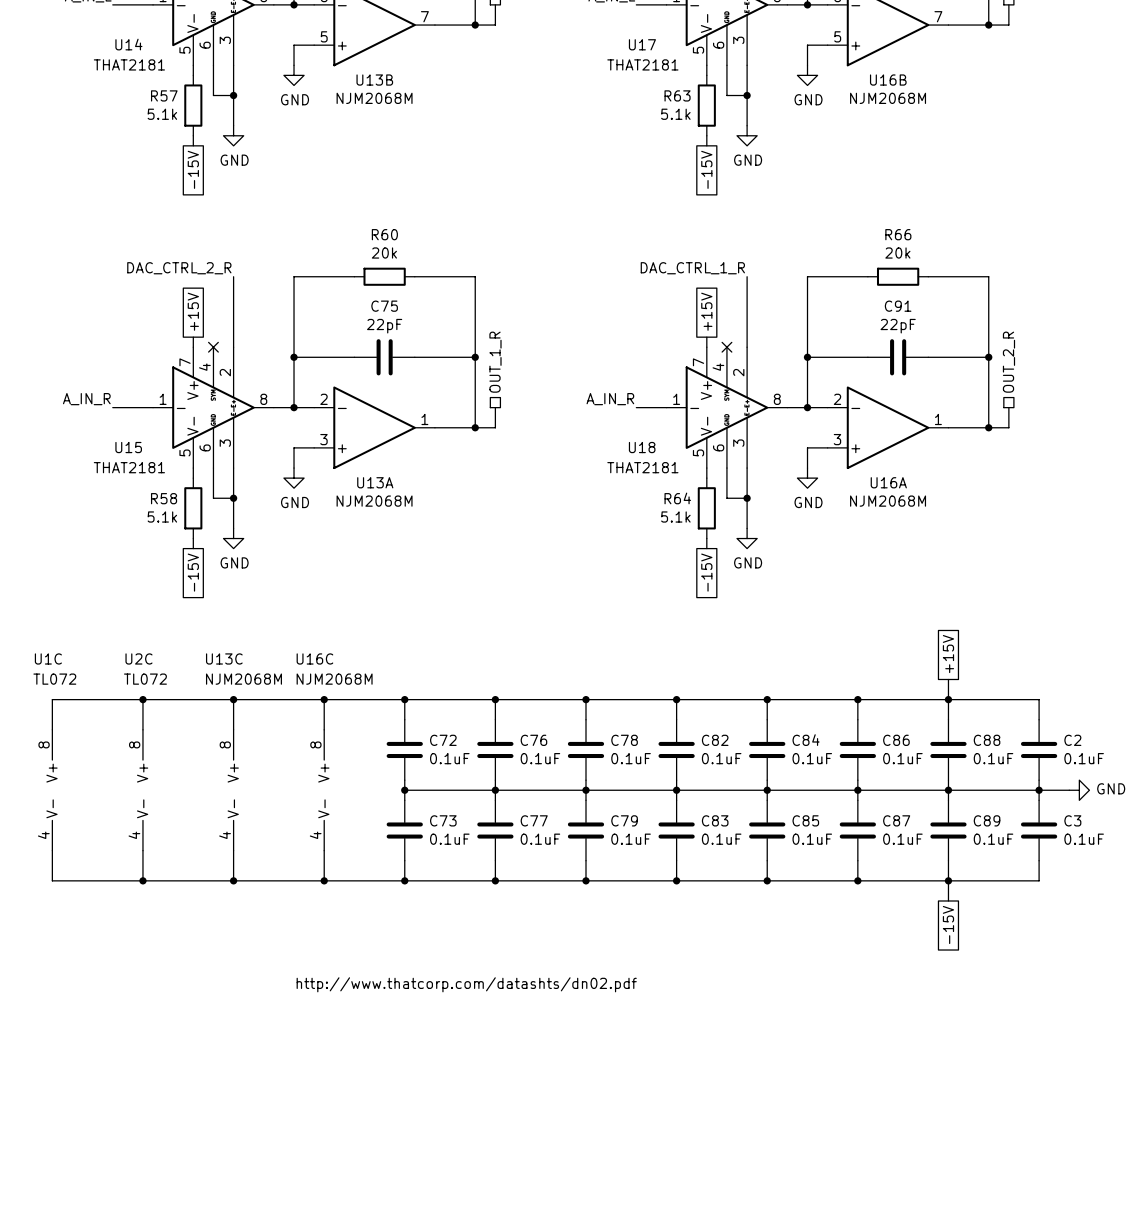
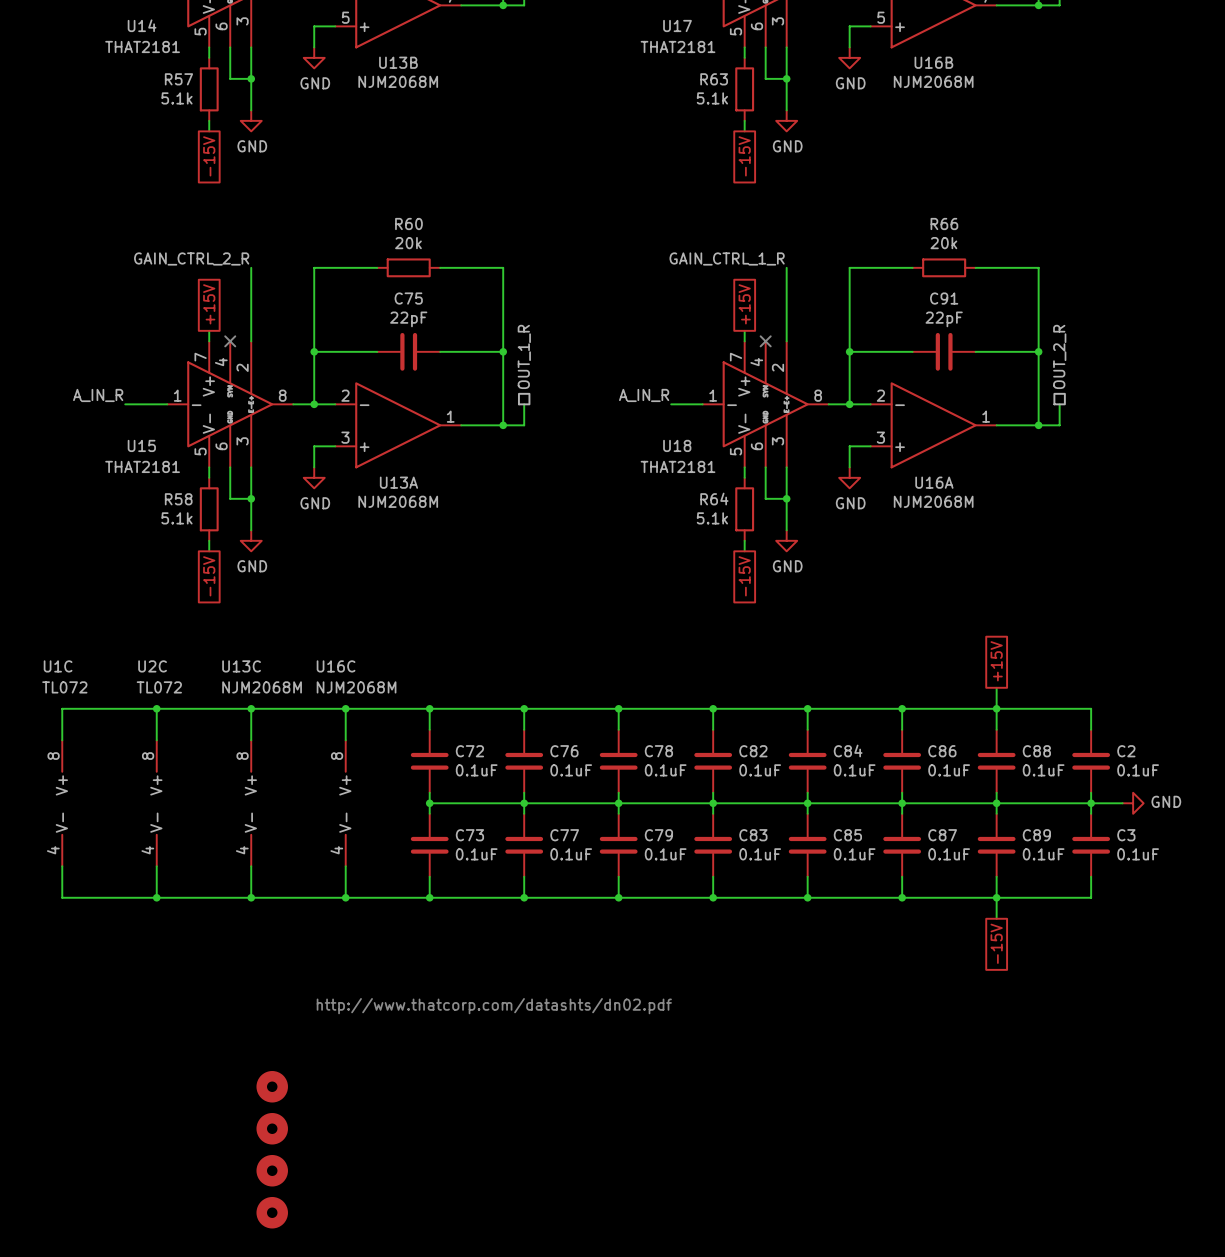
label: DAC_CTRL_2_R (179, 268) -> GAIN_CTRL_2_R (191, 258)
label: DAC_CTRL_1_R (692, 268) -> GAIN_CTRL_1_R (727, 258)
part: none -> (272, 1086)
part: none -> (272, 1128)
part: none -> (272, 1170)
part: none -> (272, 1212)

